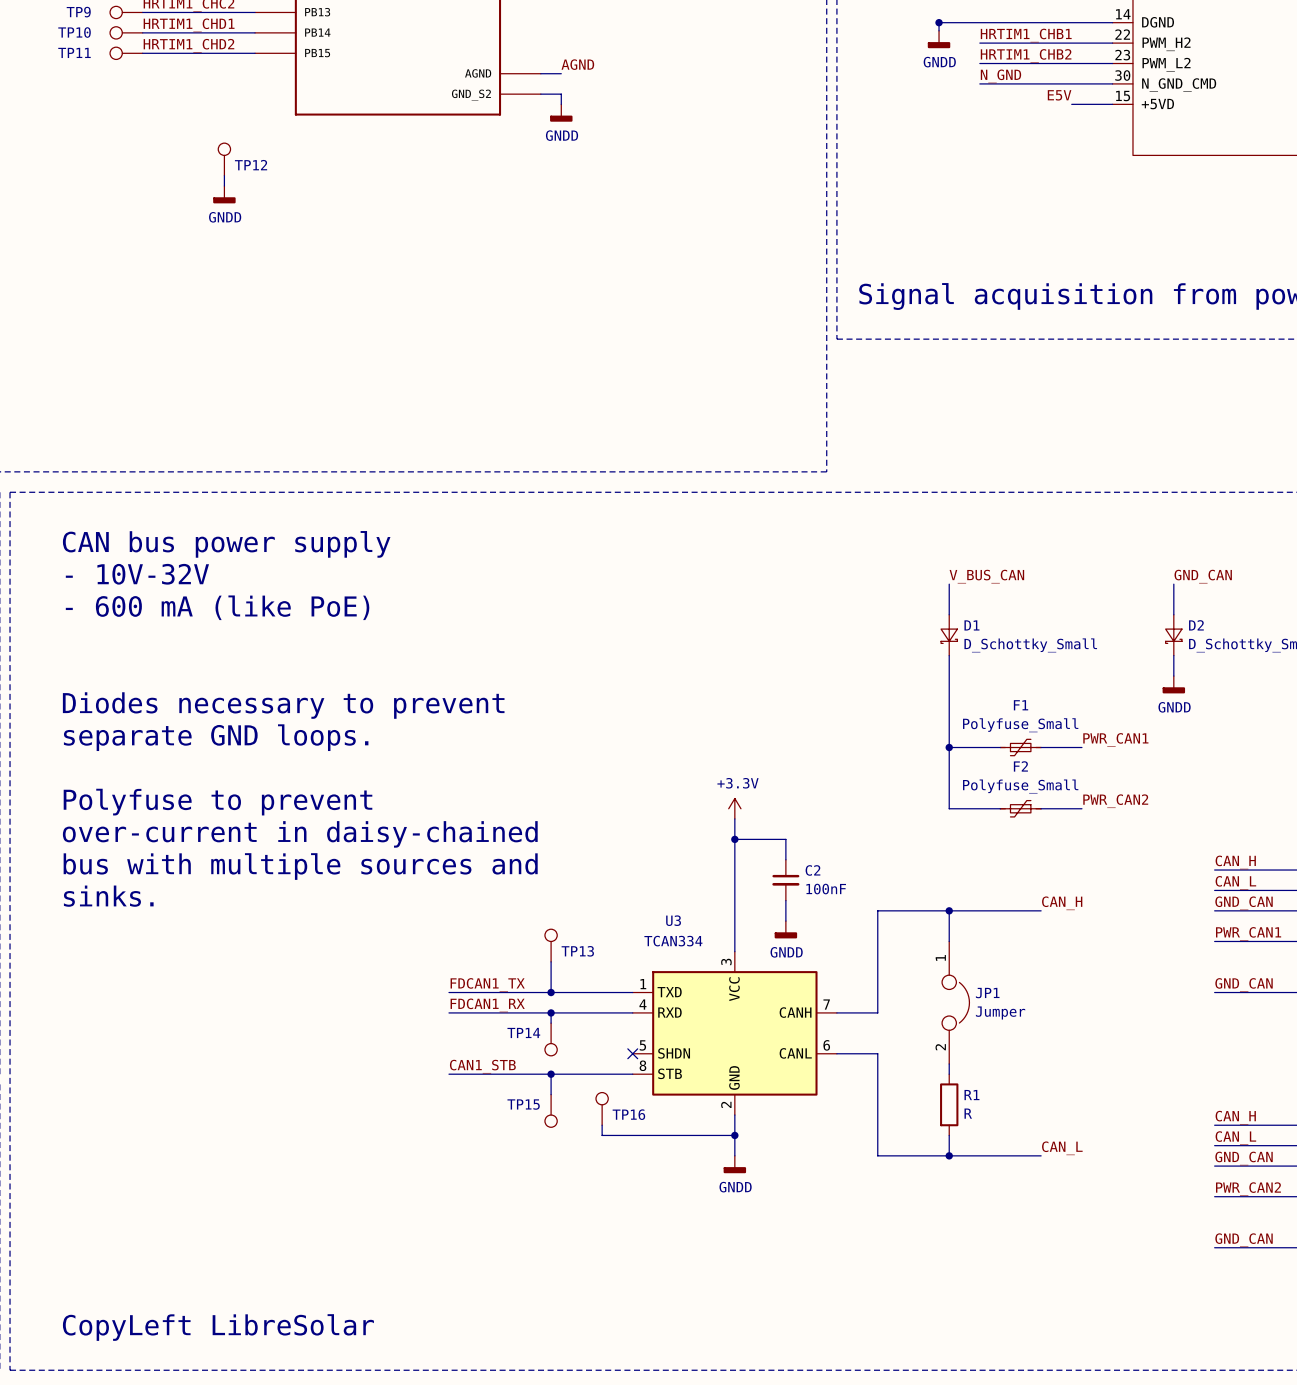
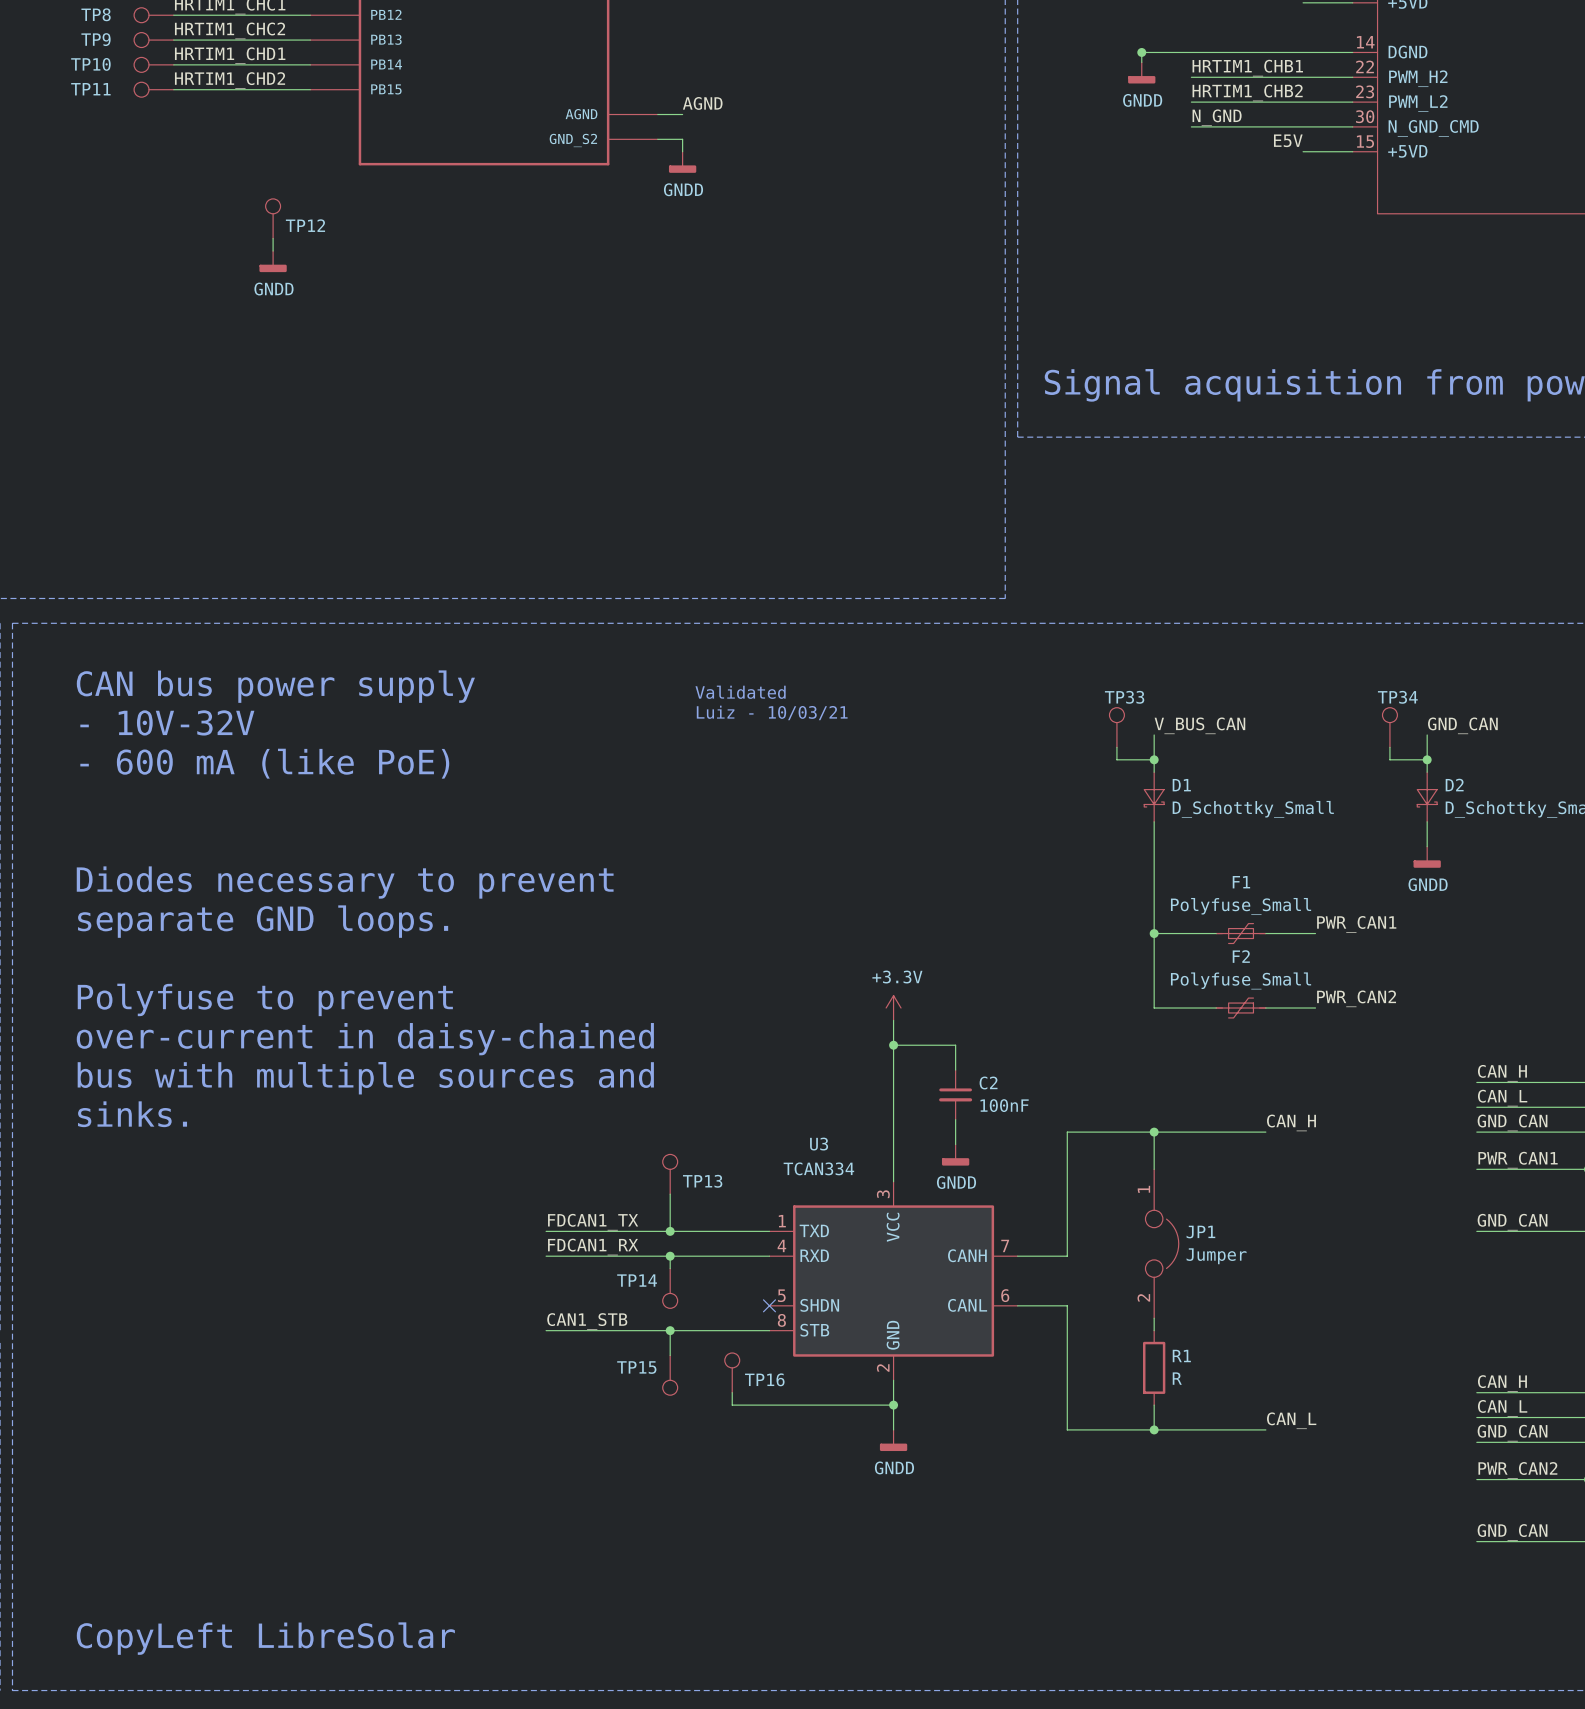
text: none -> Validated (740, 692)
text: none -> Luiz - 10/03/21 (772, 712)
TP33: none -> (1116, 727)
TP34: none -> (1389, 727)
wire: none -> (1116, 747) (1116, 759) (1154, 759)
wire: none -> (1389, 747) (1389, 759) (1427, 759)
junction: none -> (1154, 759)
junction: none -> (1427, 759)

